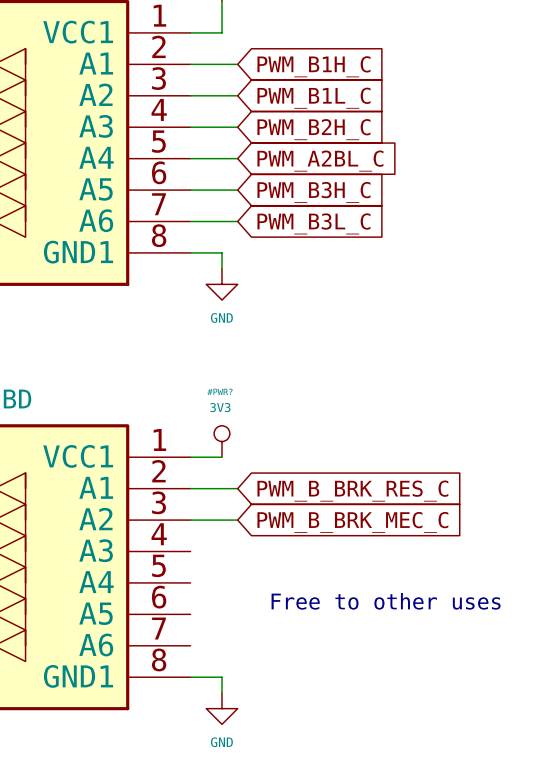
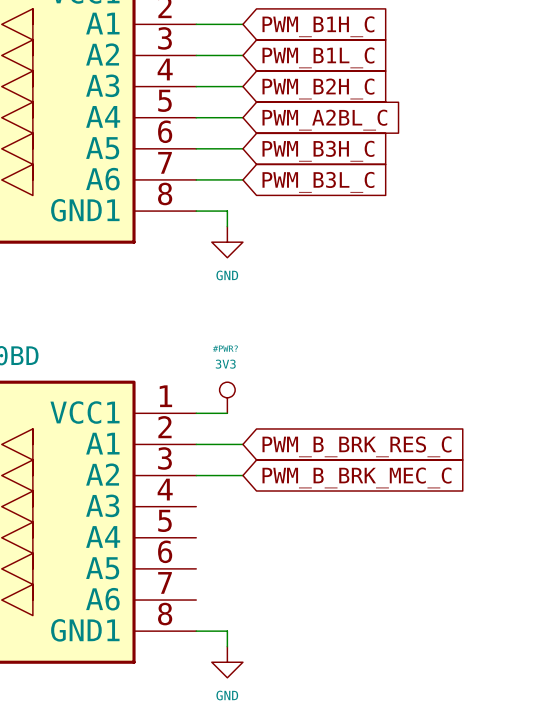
text: Free to other uses (386, 601) -> none

